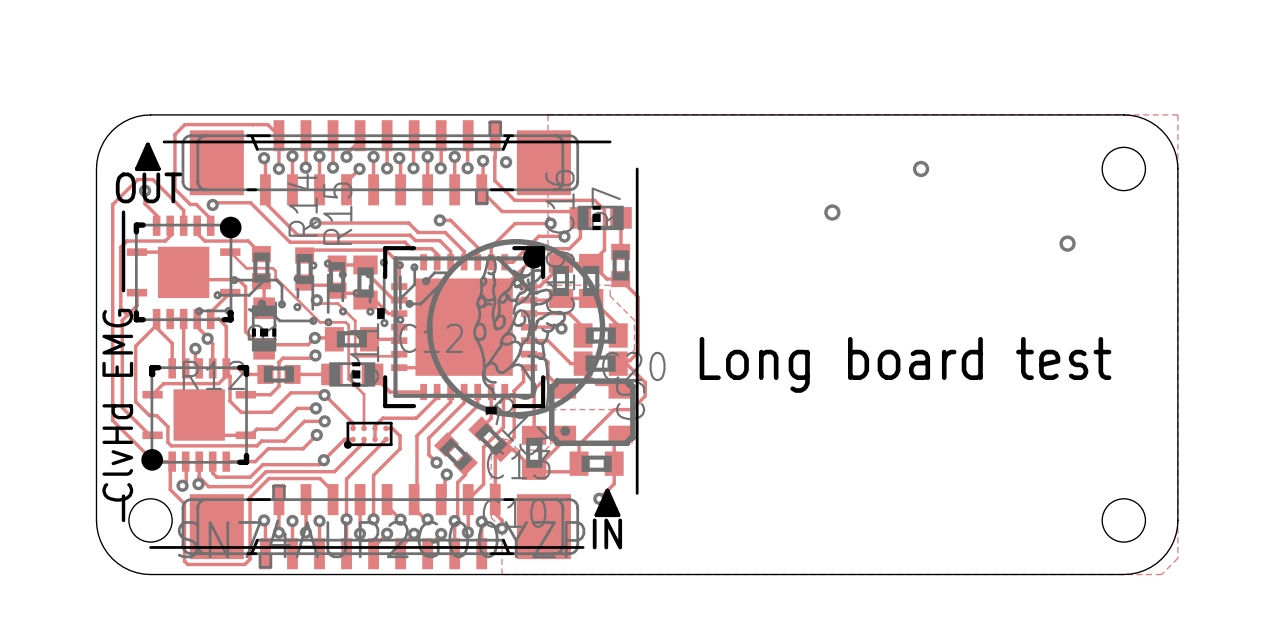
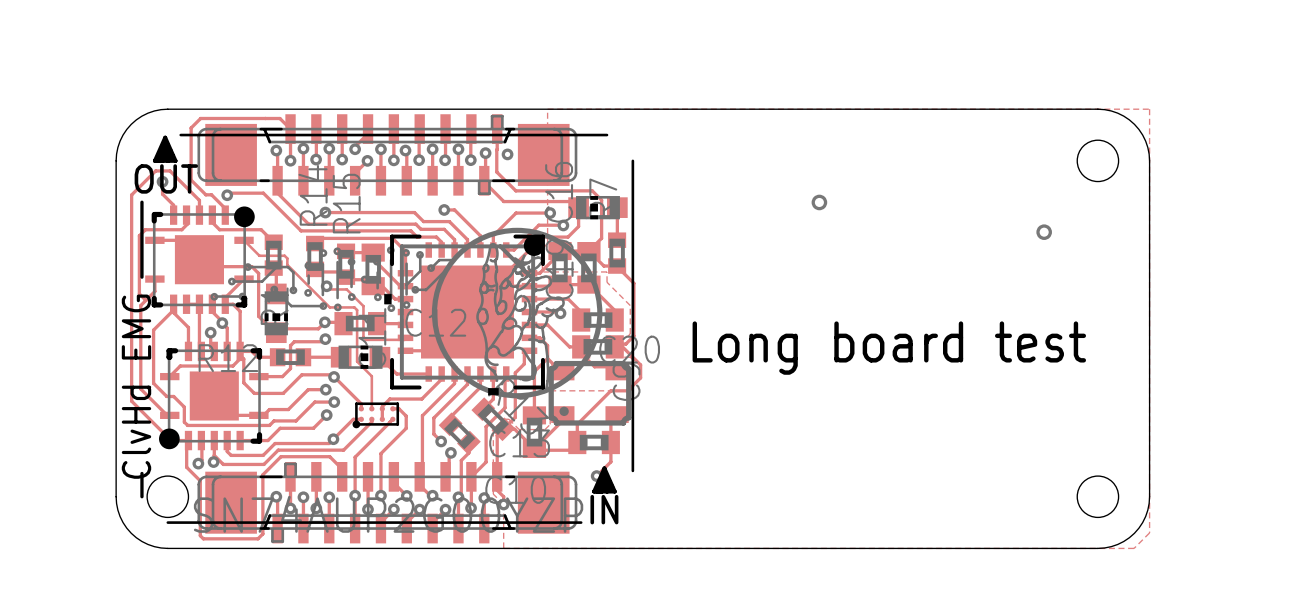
via: (921, 168) -> none

